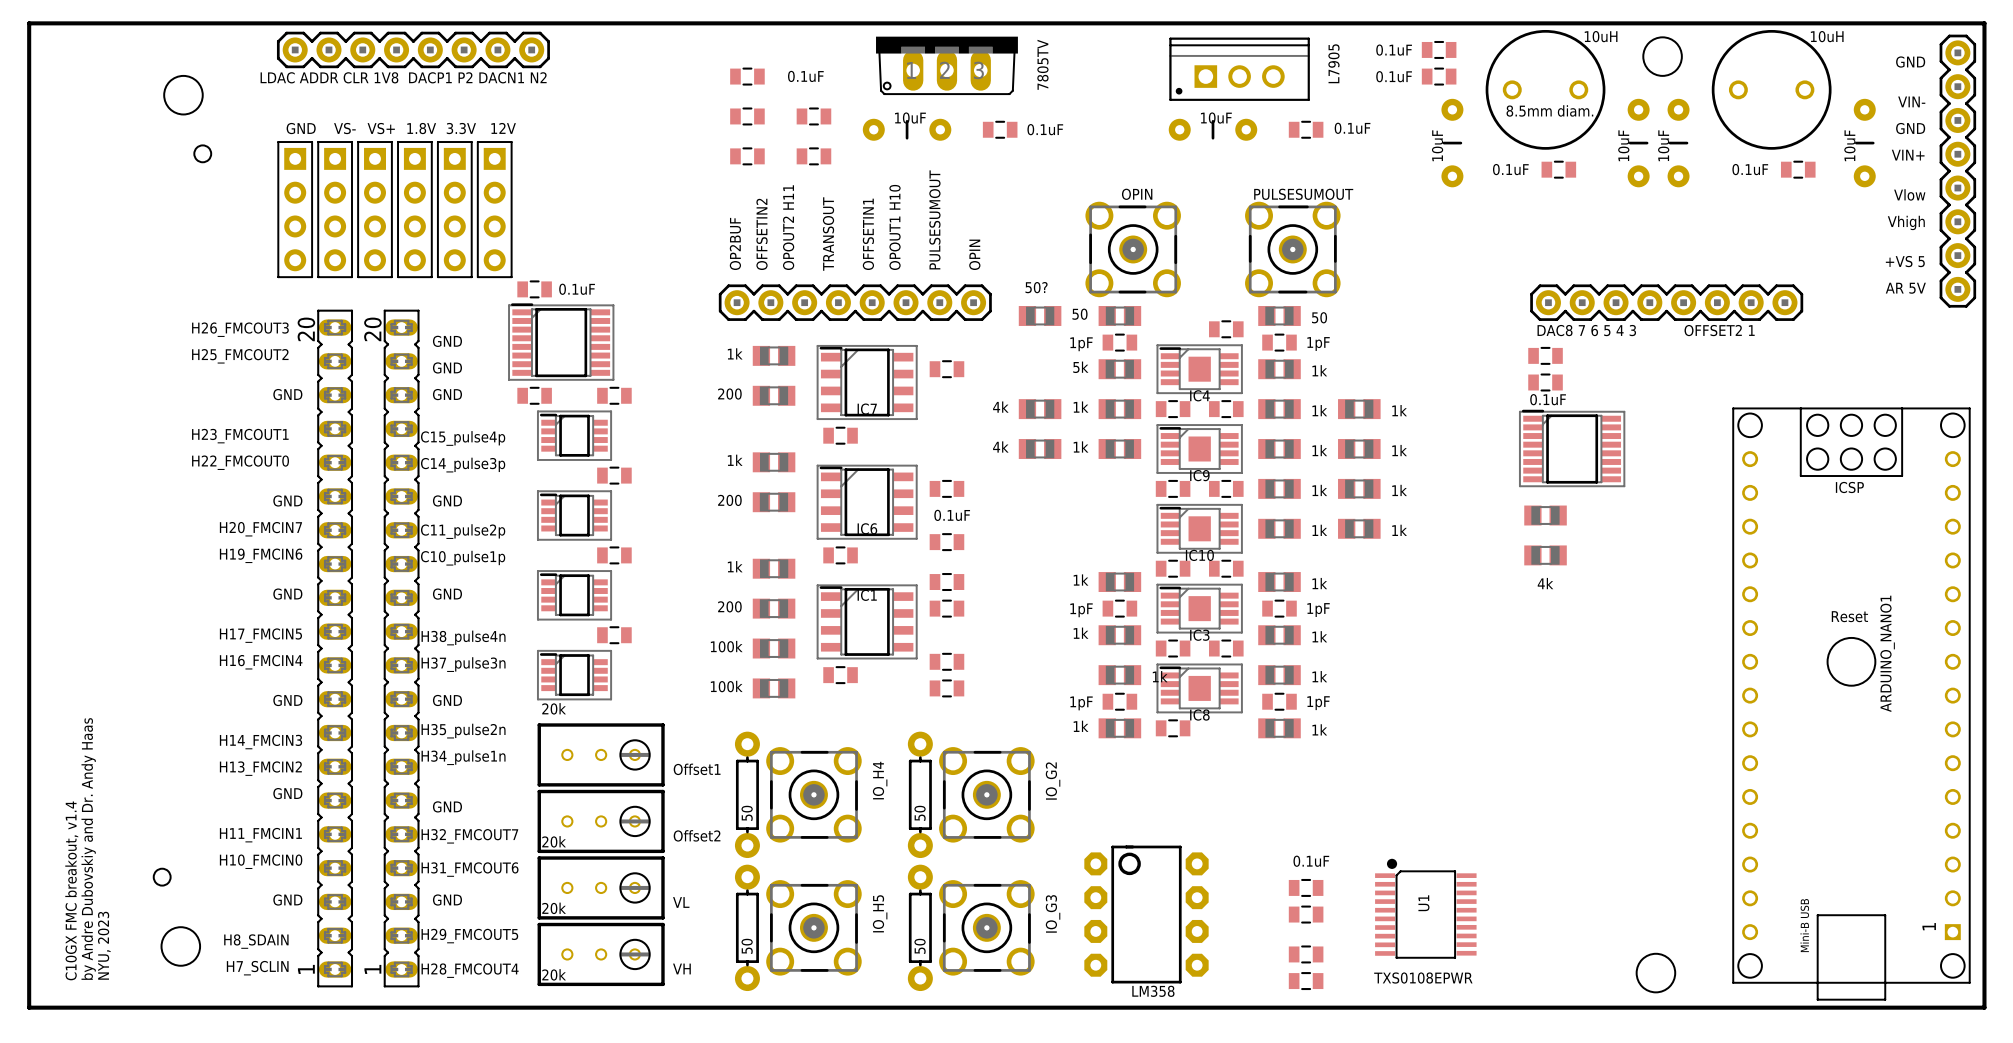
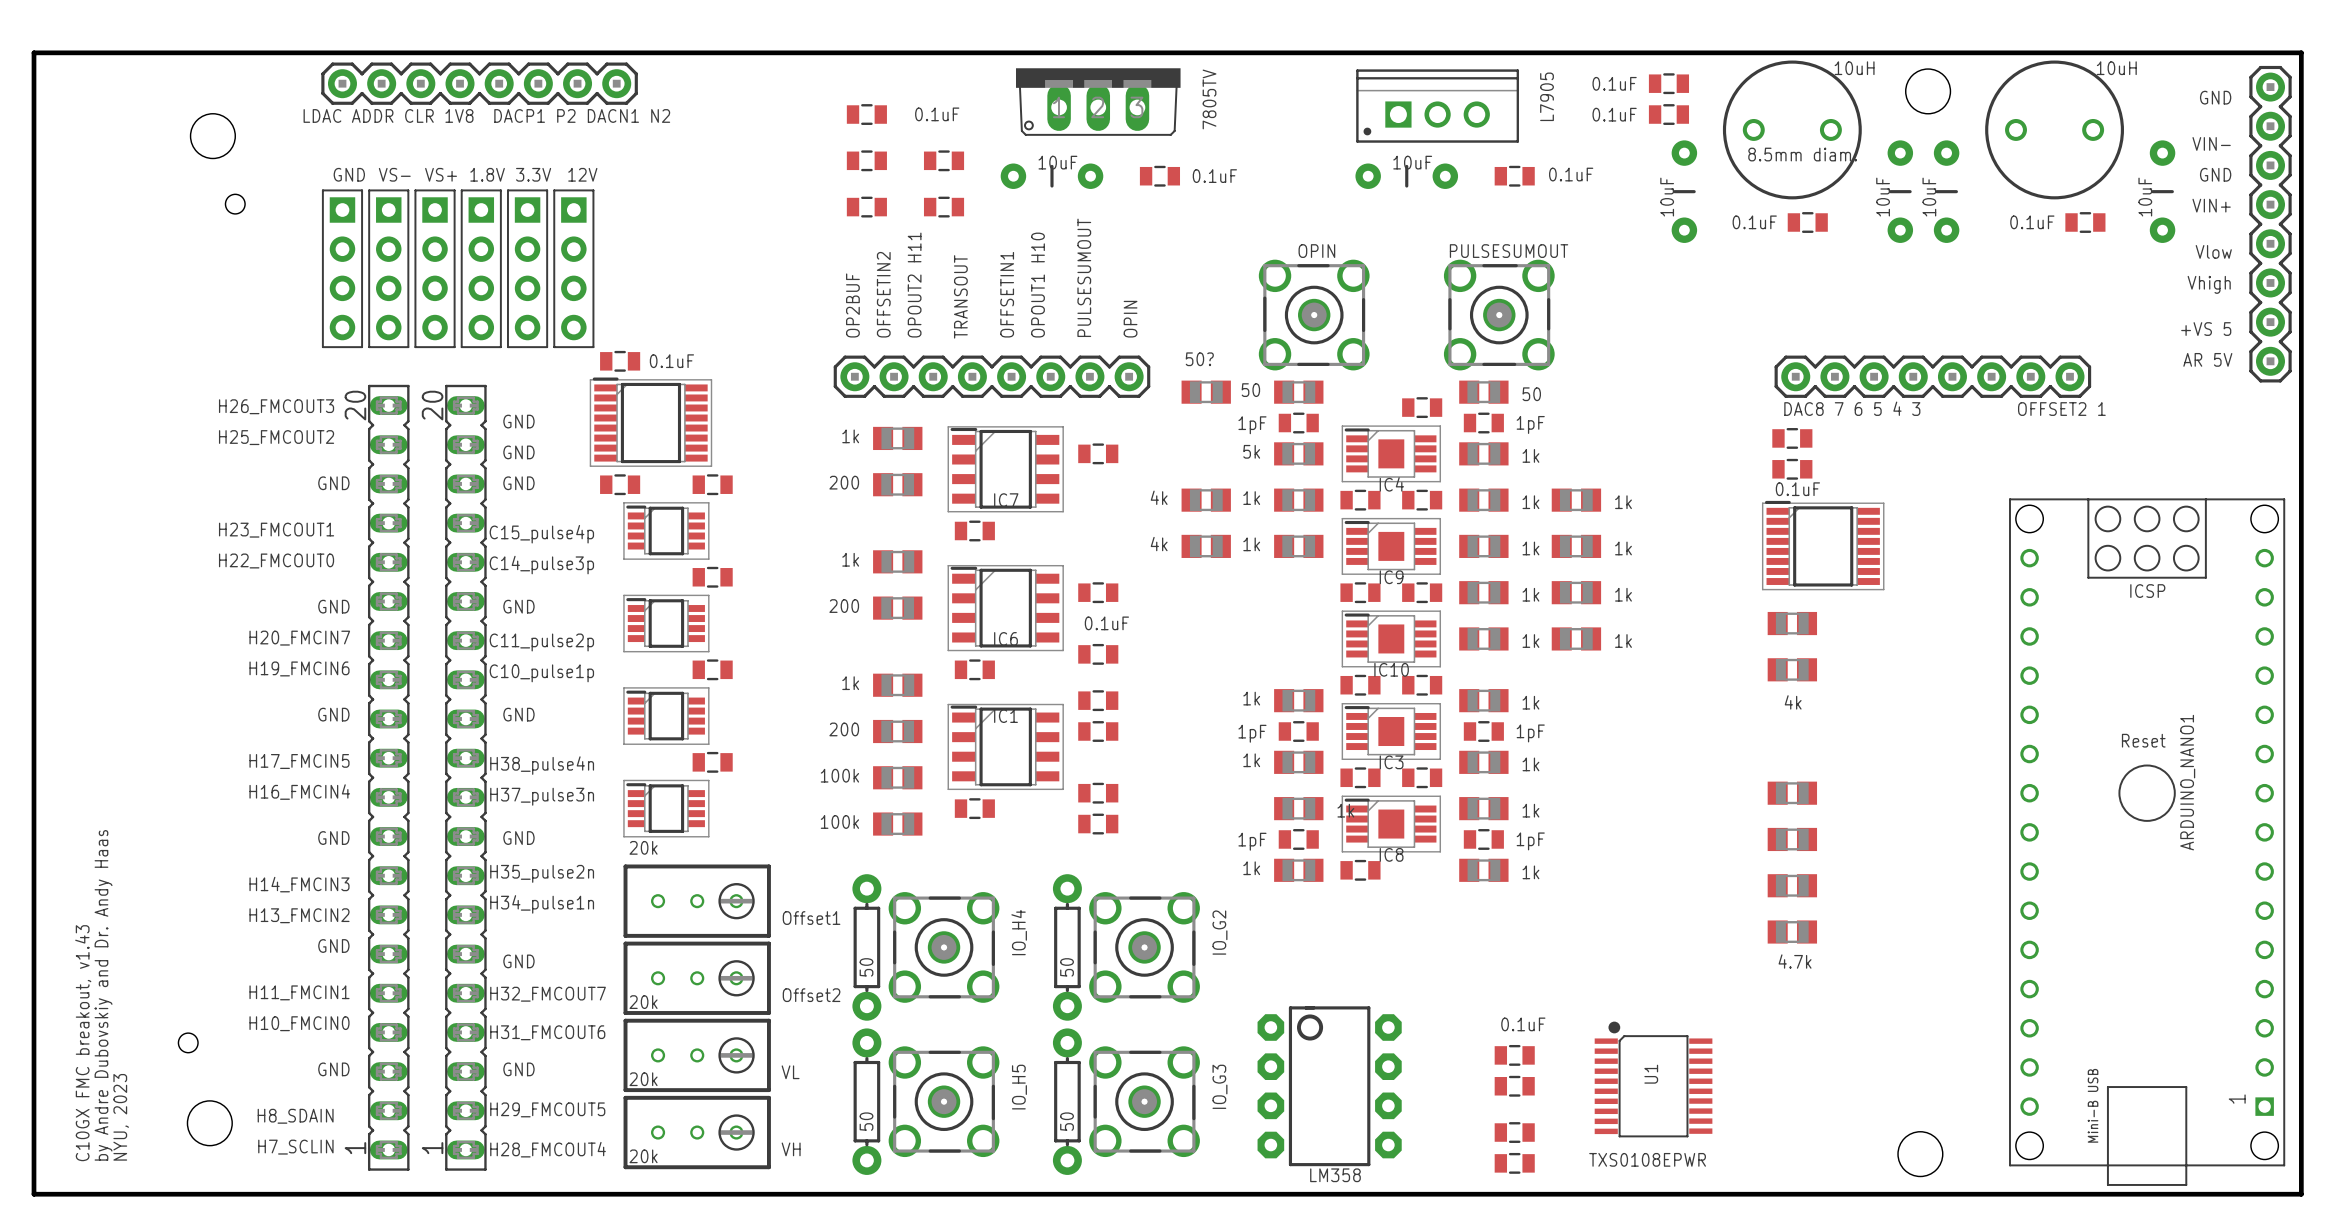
part: none -> (1792, 793)
part: none -> (1792, 839)
part: none -> (1792, 885)
part: none -> 4.7k (1792, 932)
text: C10GX FMC breakout, v1.4 (71, 890) -> C10GX FMC breakout, v1.43 (83, 1043)

